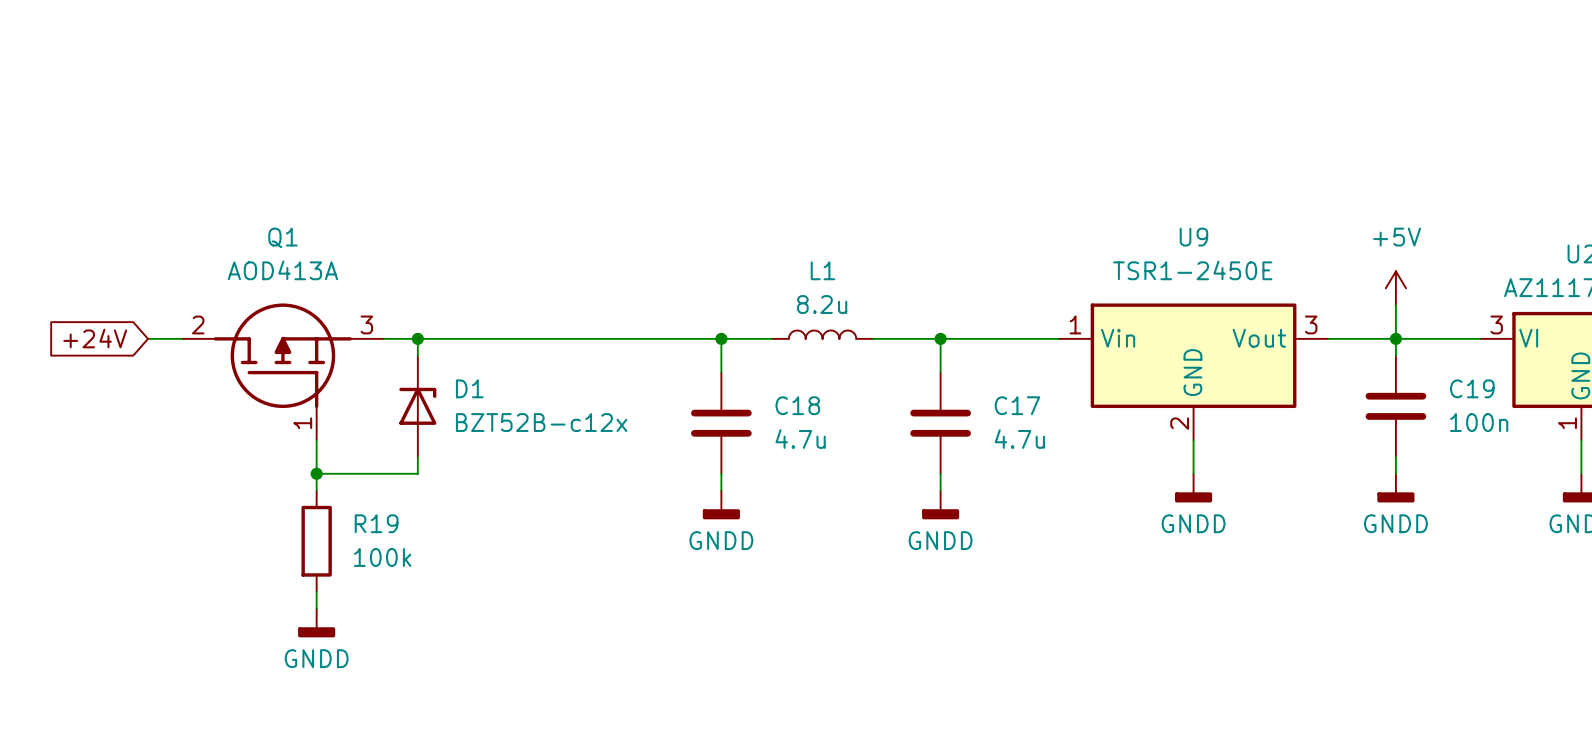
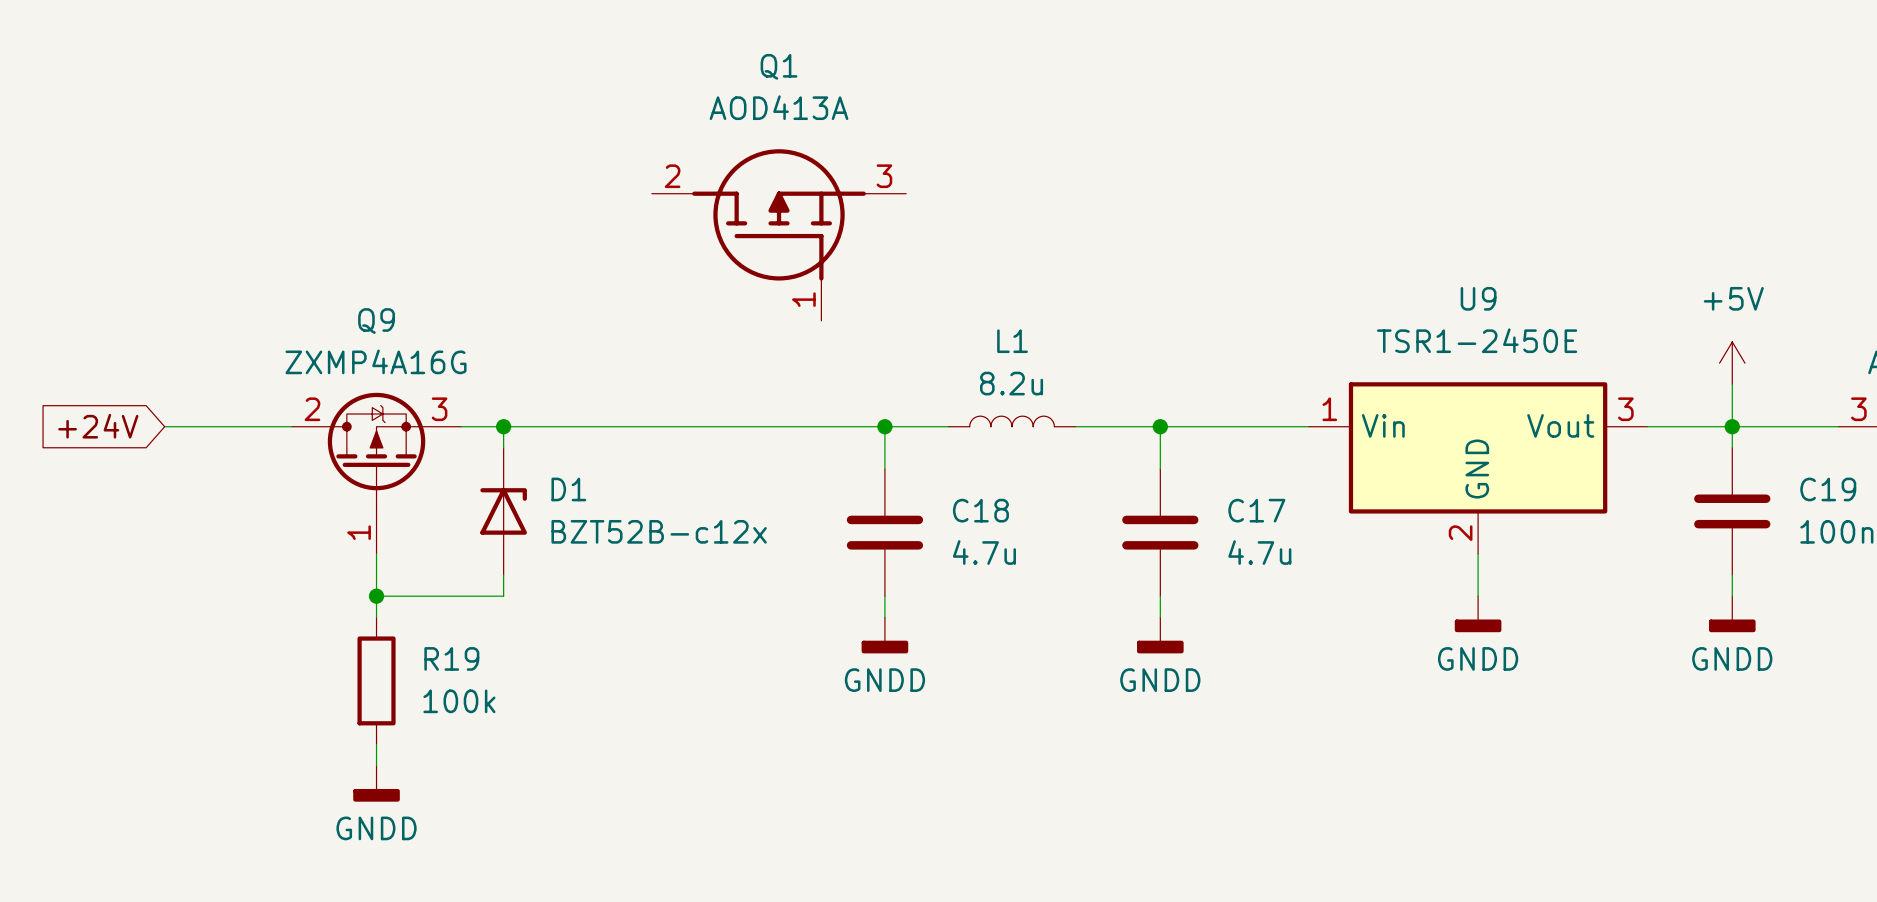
Q1 position: (282, 371) -> (779, 235)
Q9: none -> ZXMP4A16G (376, 473)

